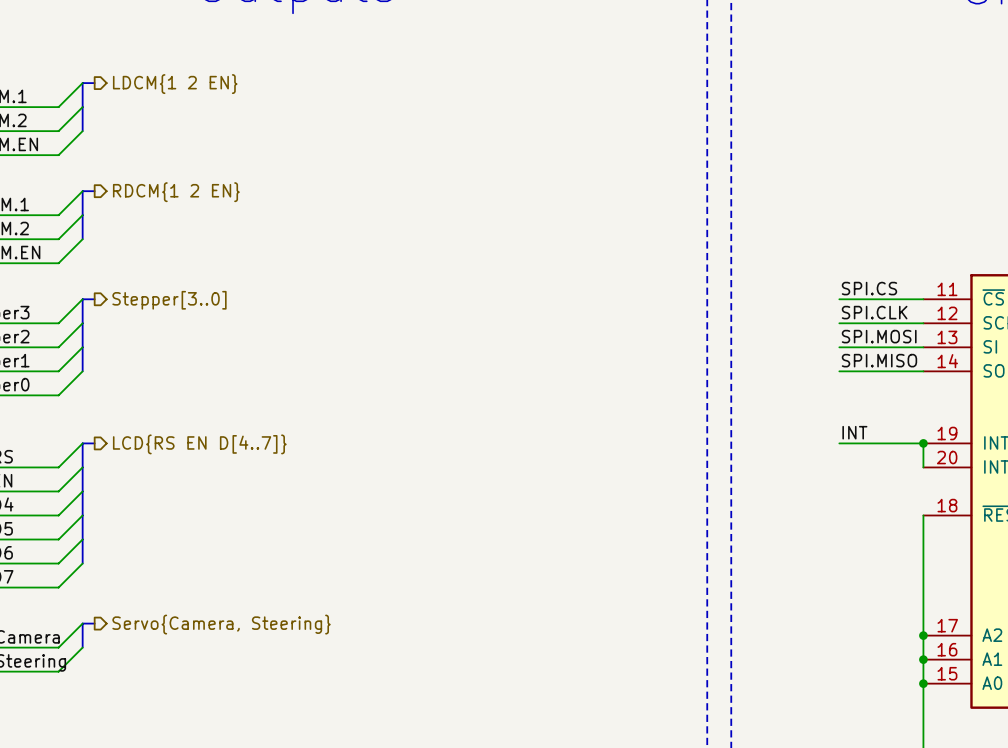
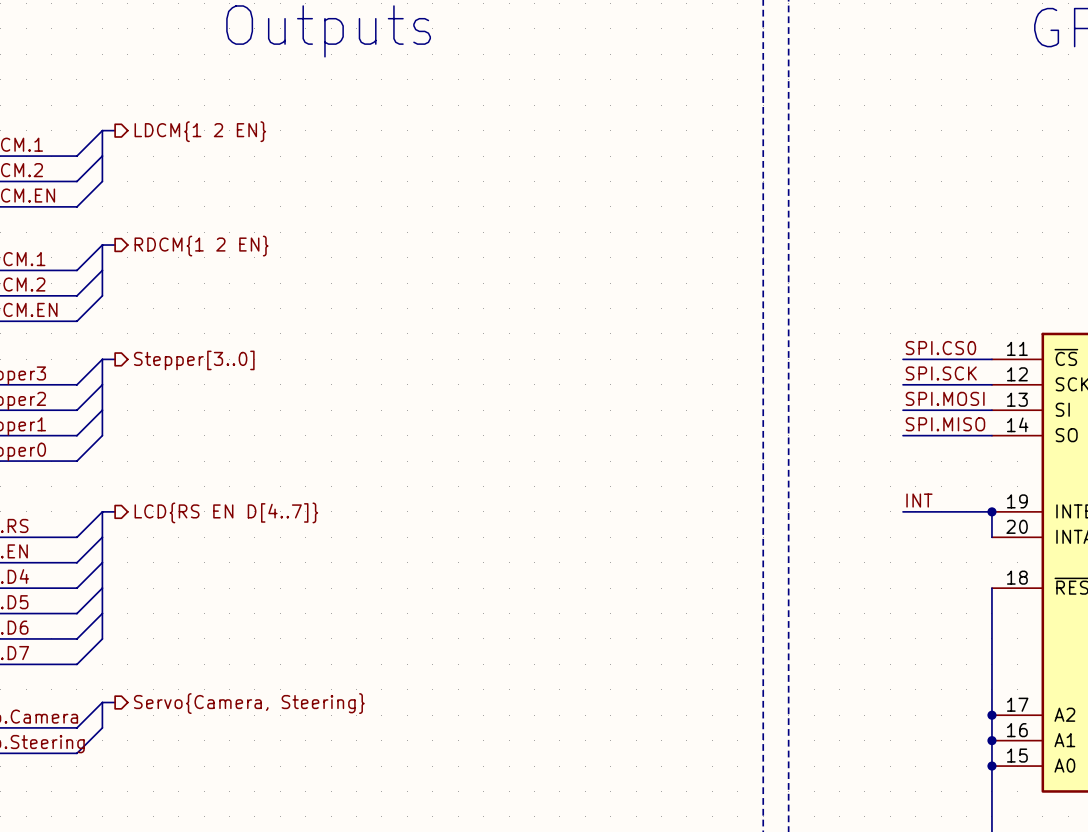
label: SPI.CS (869, 288) -> SPI.CS0 (940, 348)
label: SPI.CLK (874, 312) -> SPI.SCK (941, 373)

